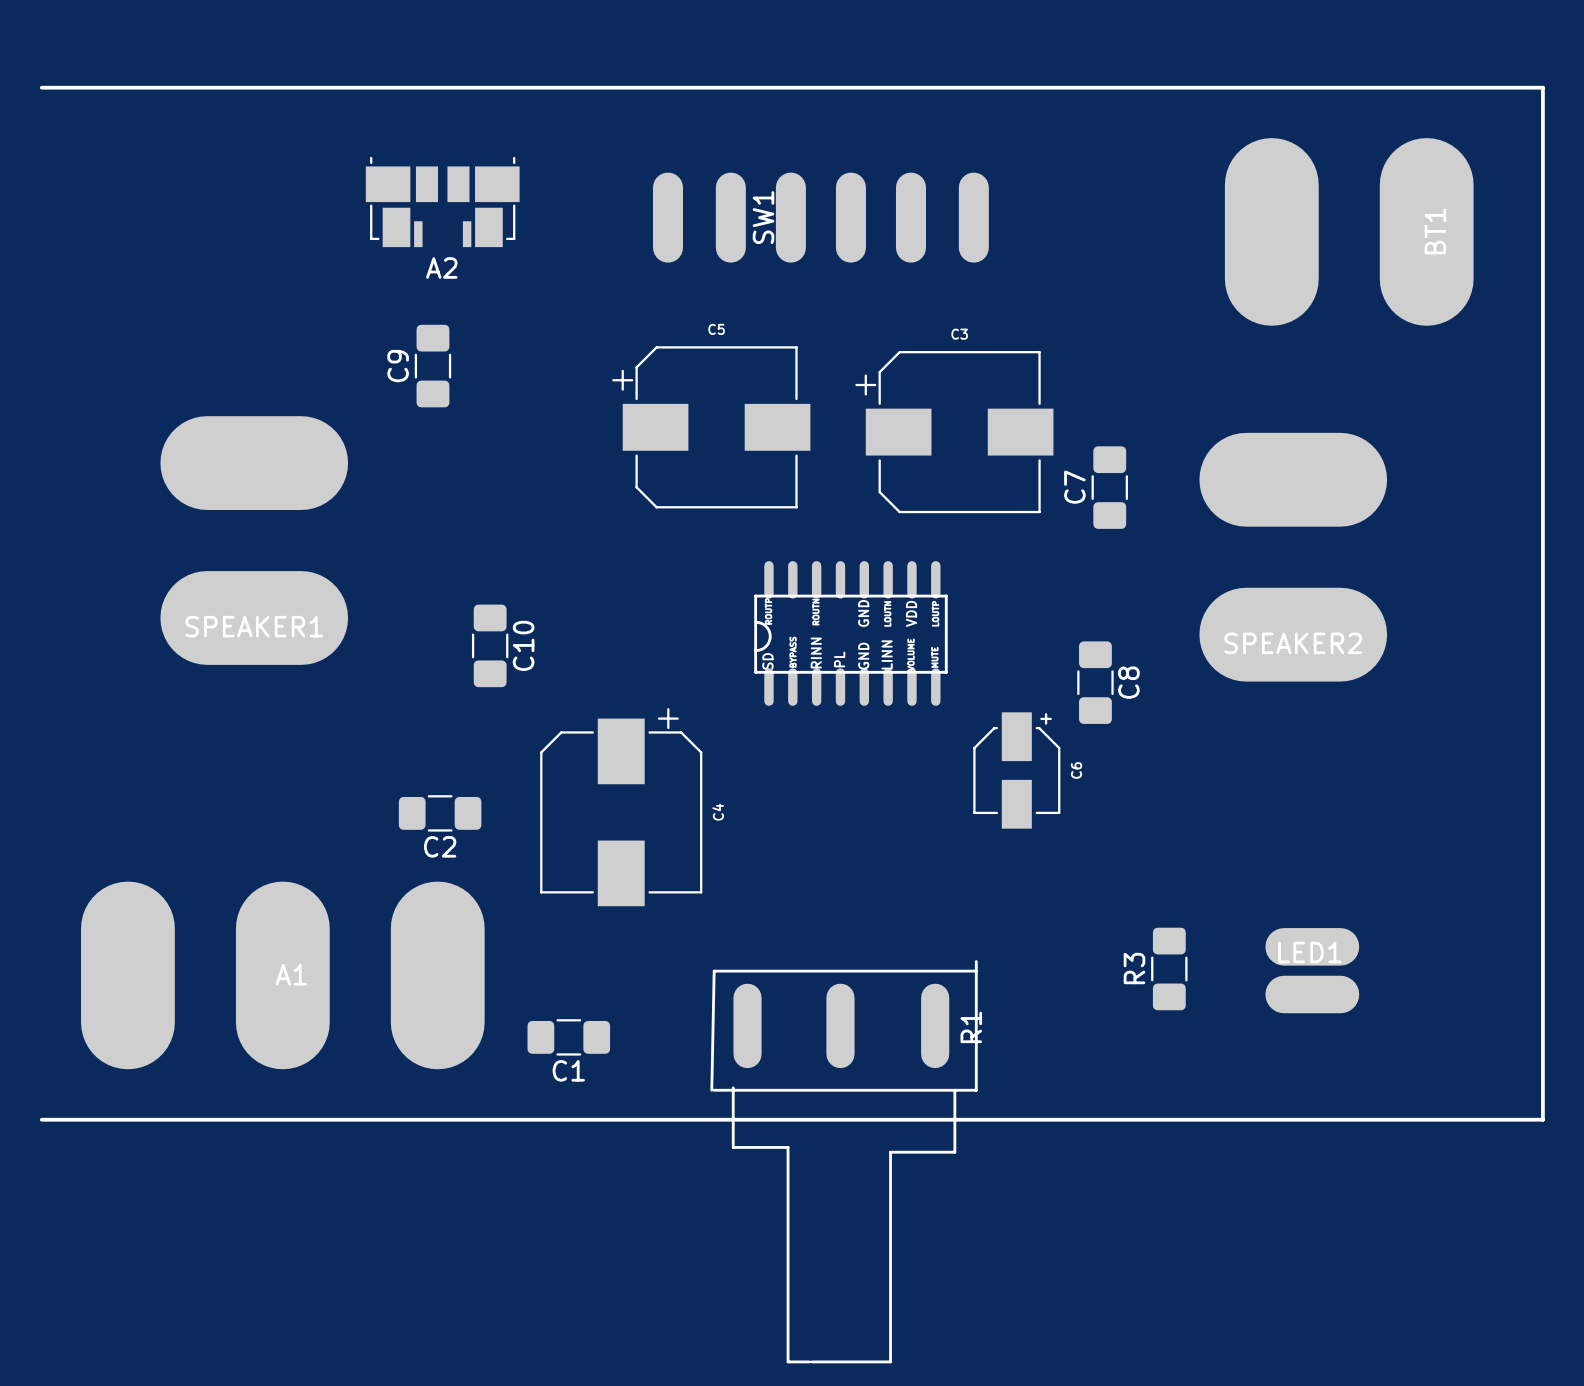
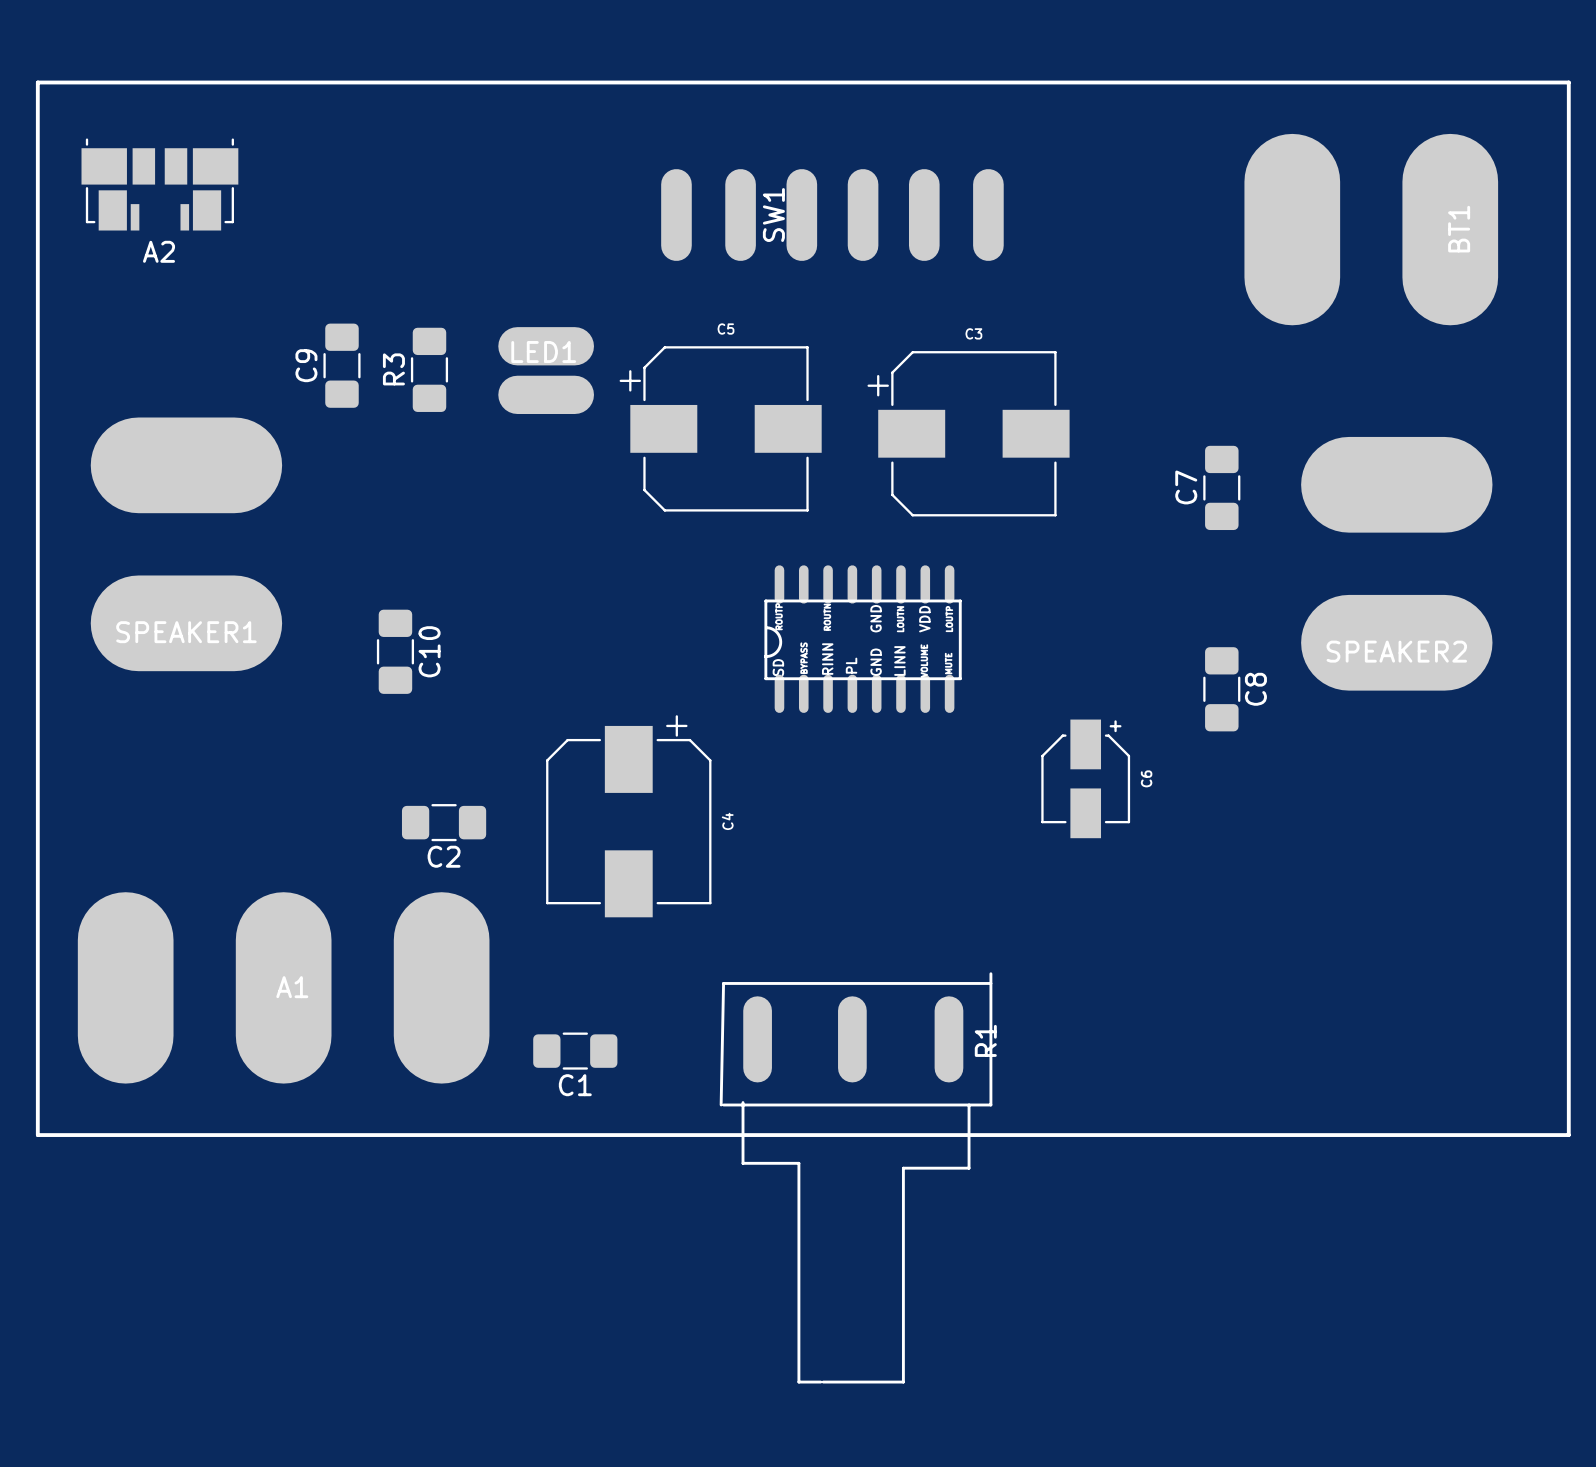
line: none -> (37, 82) (37, 1135)
A2 position: (442, 202) -> (159, 184)
C9 position: (432, 366) -> (341, 365)
C7 position: (1109, 487) -> (1221, 487)
part position: (254, 540) -> (186, 544)
part position: (1293, 557) -> (1396, 563)
C10 position: (490, 645) -> (395, 651)
C8 position: (1095, 682) -> (1221, 689)
C6 position: (1016, 770) -> (1085, 778)
R3 position: (1169, 968) -> (429, 369)
part position: (1312, 970) -> (546, 370)

